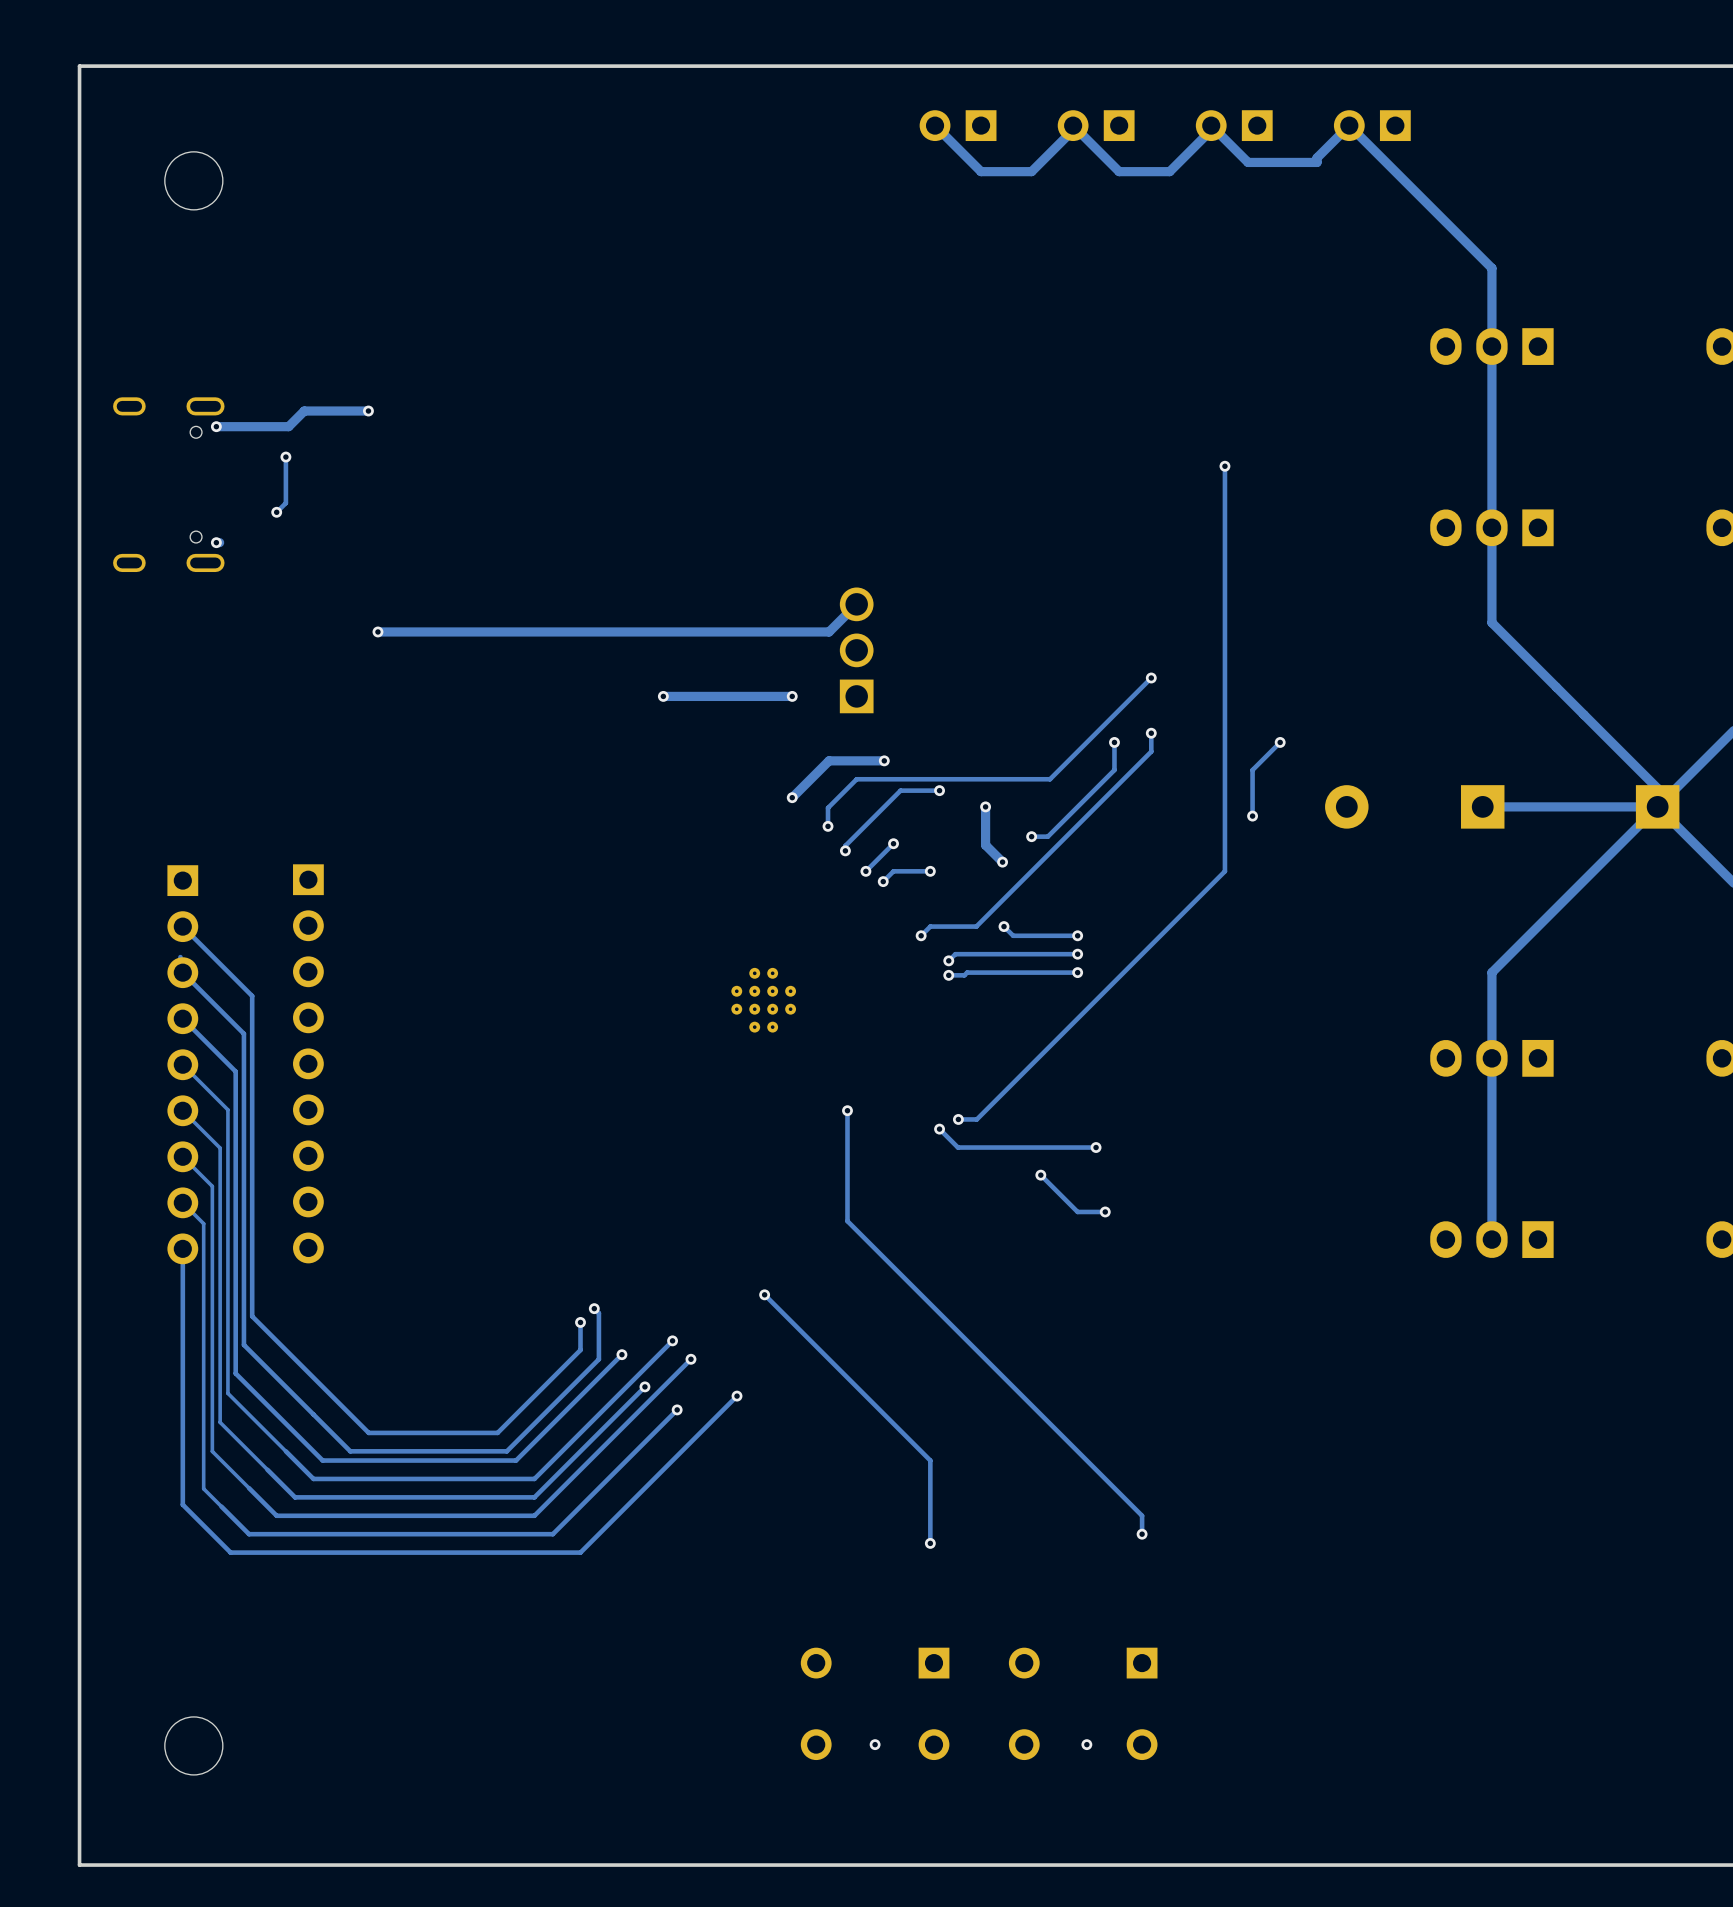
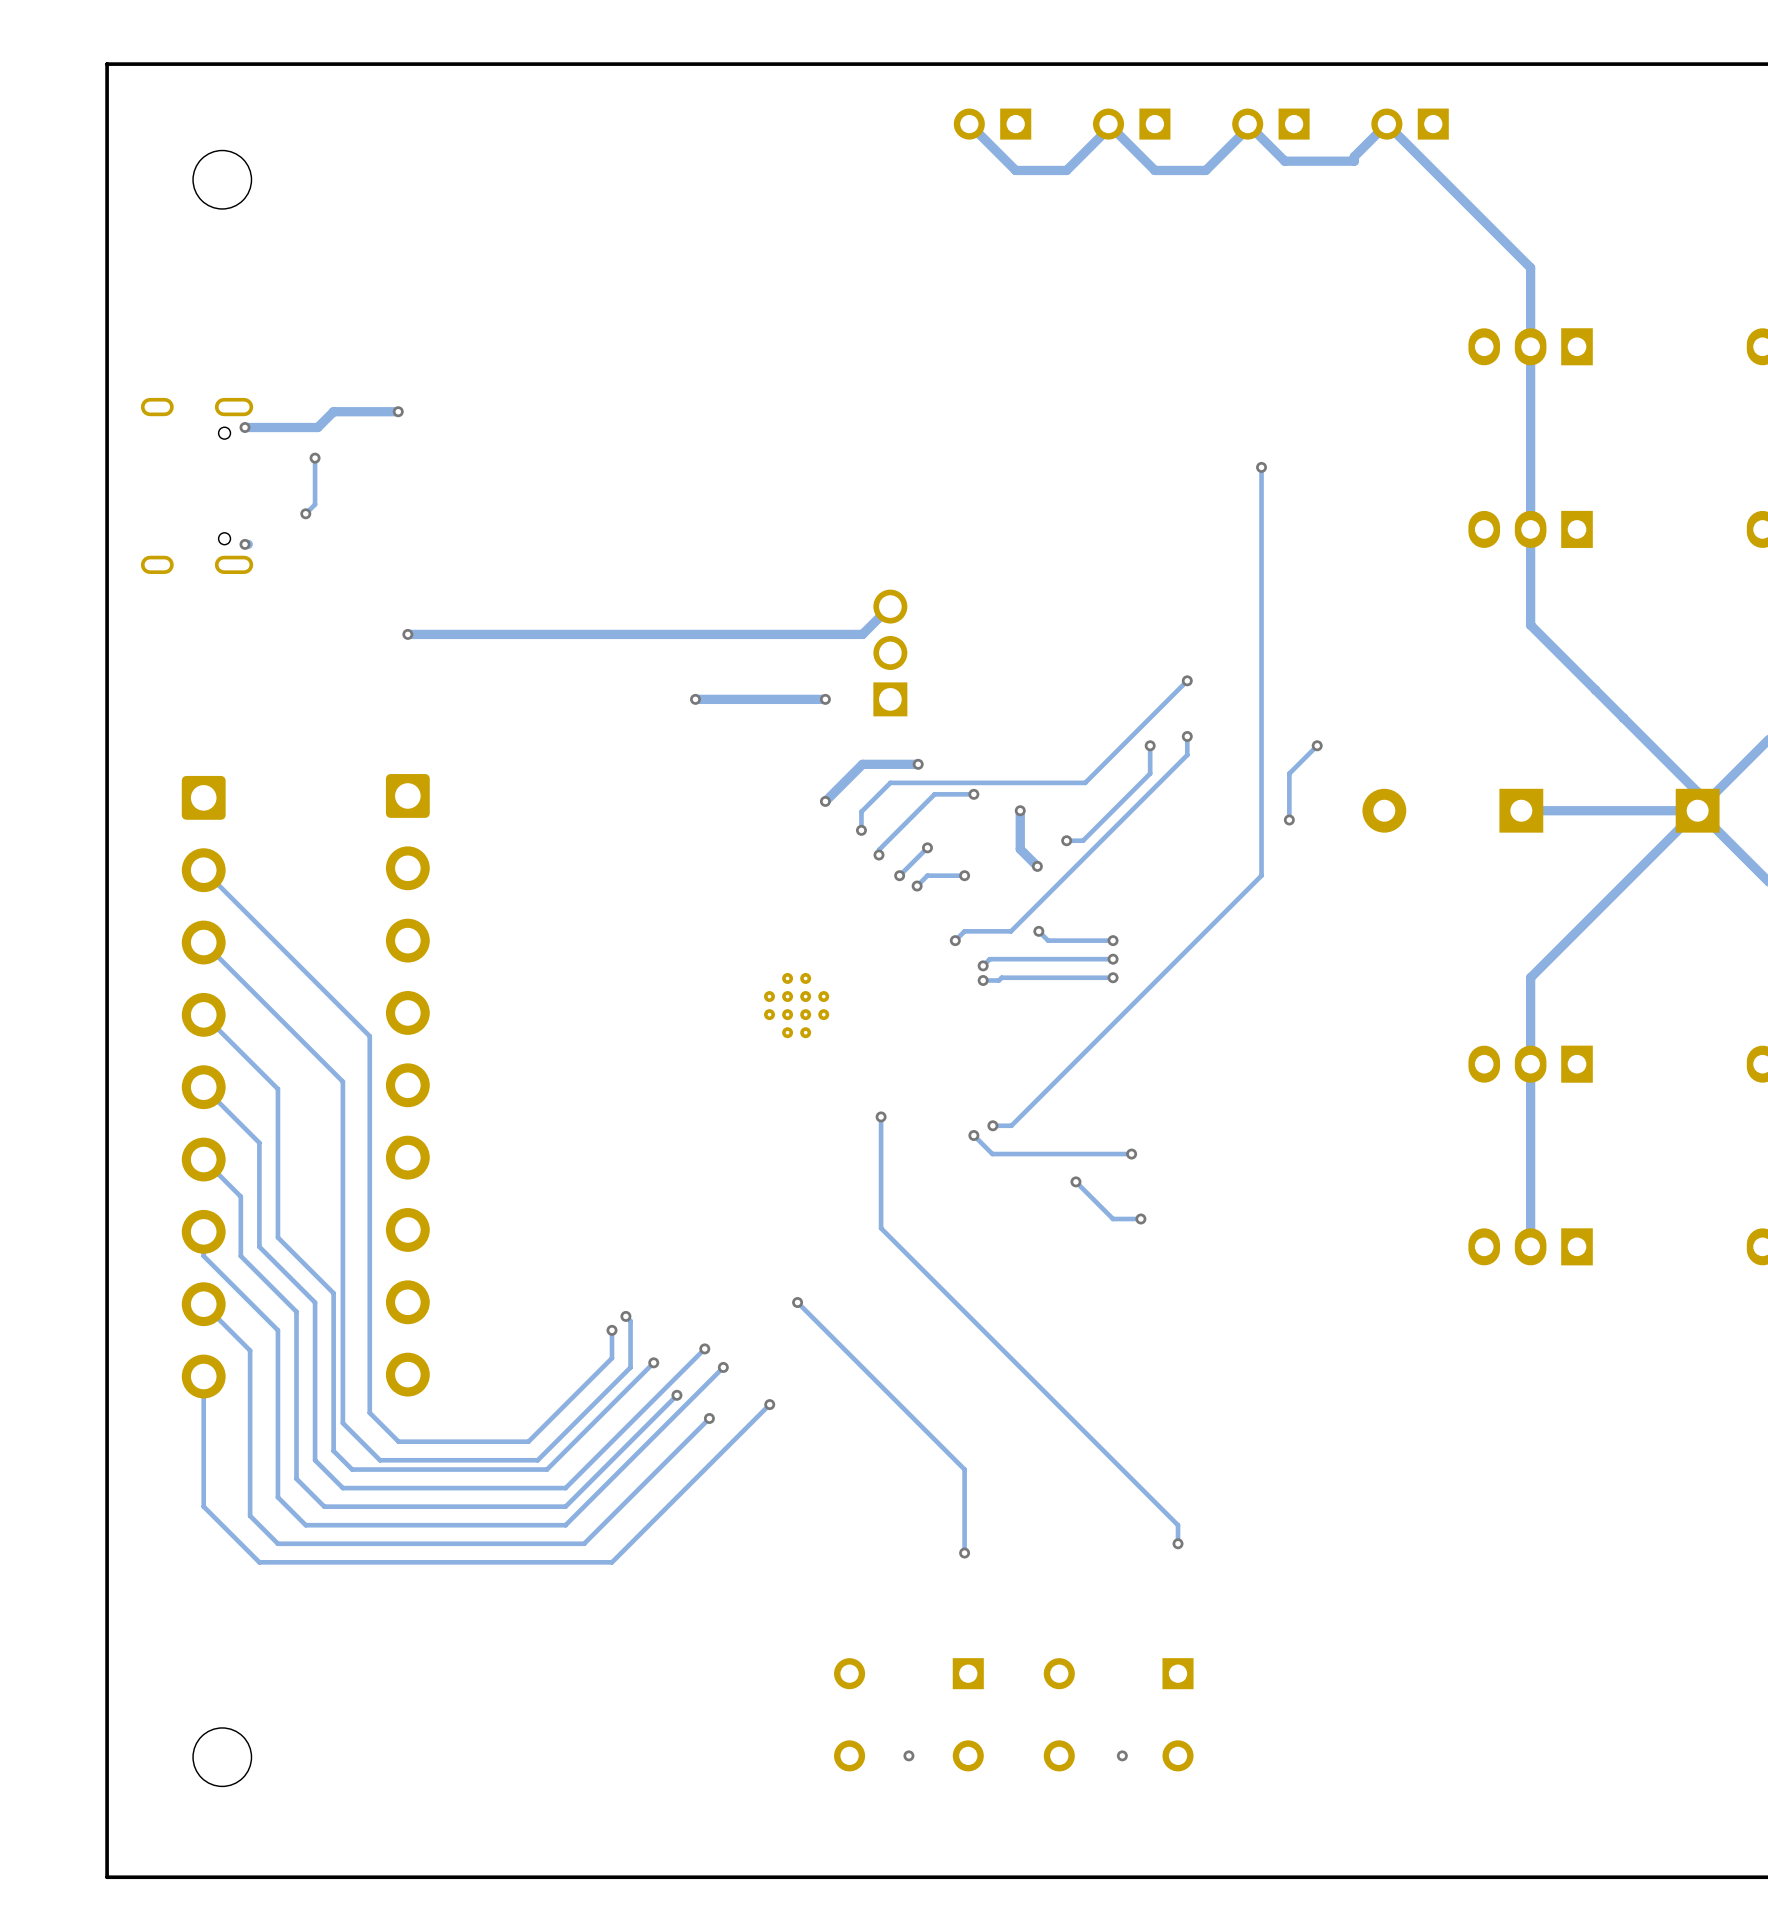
part footprint: [167, 865, 199, 1265] -> [181, 775, 226, 1399]
track: (182, 926) (252, 996) (252, 1316) (340, 1404) -> (203, 870) (369, 1036) (369, 1412)
track: (180, 957) (180, 970) (243, 1033) (243, 1344) (313, 1414) -> (203, 942) (342, 1081) (342, 1423)
track: (182, 1018) (235, 1071) (235, 1373) (304, 1442) -> (203, 1014) (277, 1089) (277, 1237) (333, 1293) (333, 1450)
part: (308, 1063) -> none
track: (182, 1064) (227, 1109) (227, 1393) (285, 1451) -> (203, 1087) (259, 1142) (259, 1246) (315, 1302) (315, 1460)
part: none -> (407, 1085)
track: (182, 1110) (220, 1148) (220, 1422) (267, 1469) -> (203, 1159) (240, 1196) (240, 1256) (296, 1311) (296, 1478)
track: (182, 1156) (212, 1186) (212, 1451) (249, 1488) -> (203, 1231) (203, 1256) (277, 1330) (277, 1497)
track: (182, 1202) (203, 1223) (203, 1488) (221, 1506) -> (203, 1304) (250, 1350) (250, 1515)
track: (182, 1248) (182, 1504) -> (203, 1376) (203, 1506) (211, 1514)

